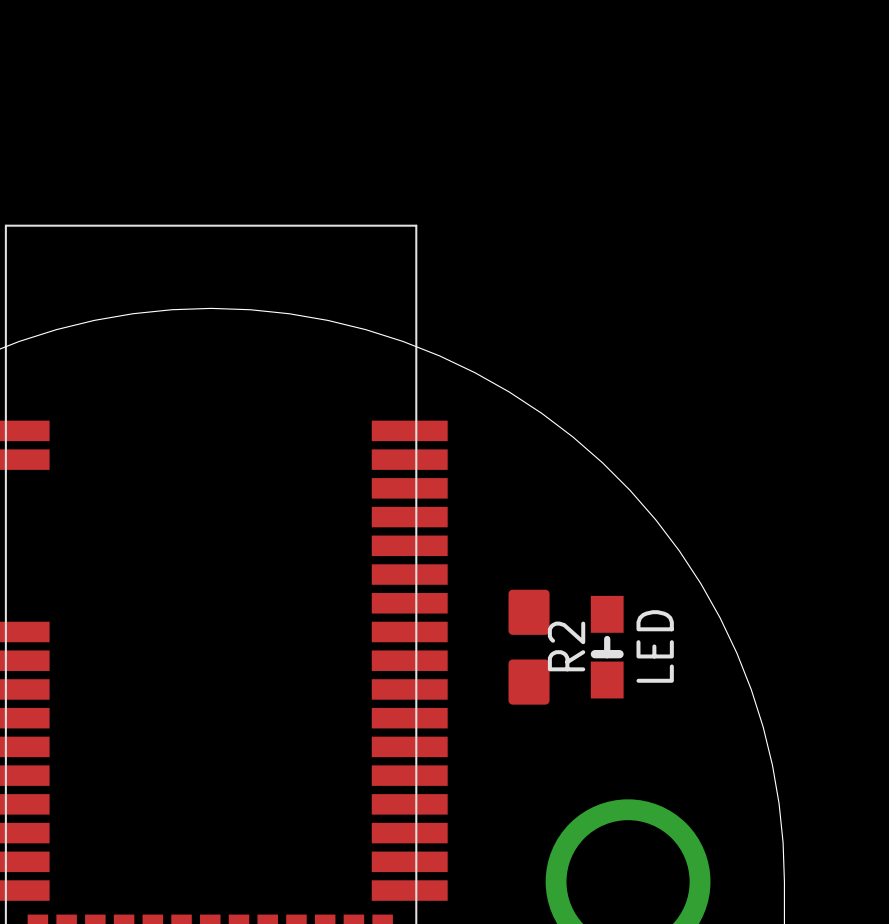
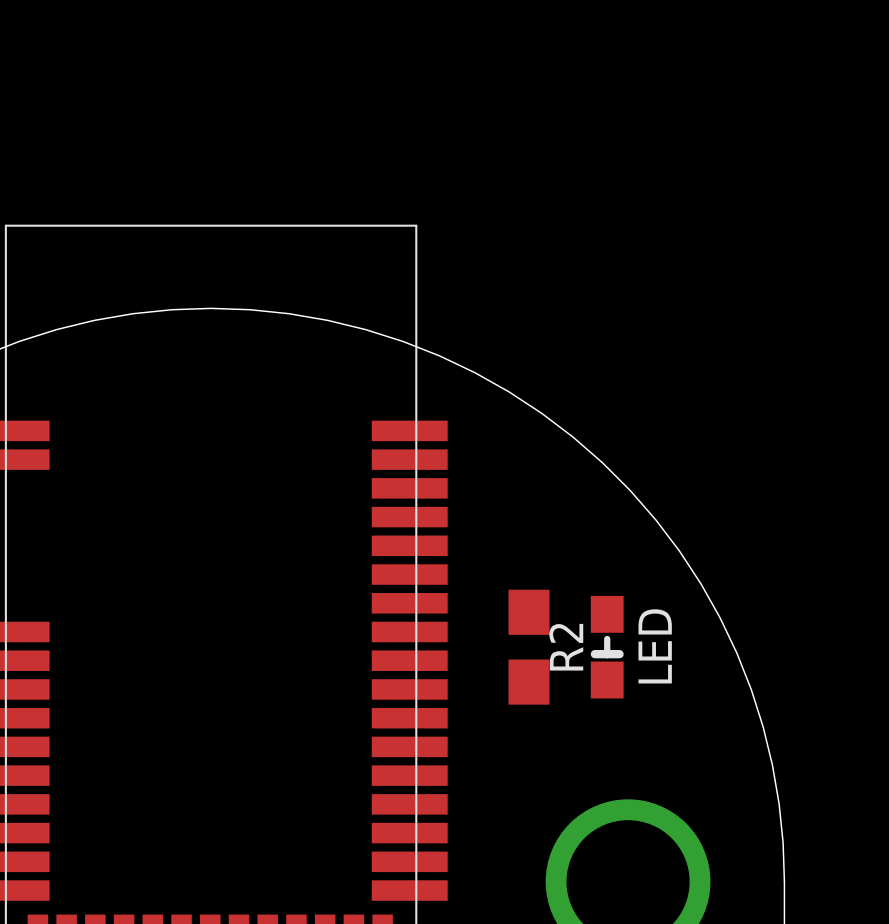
R2 footprint: [508, 589, 550, 705] -> [508, 589, 550, 705]

